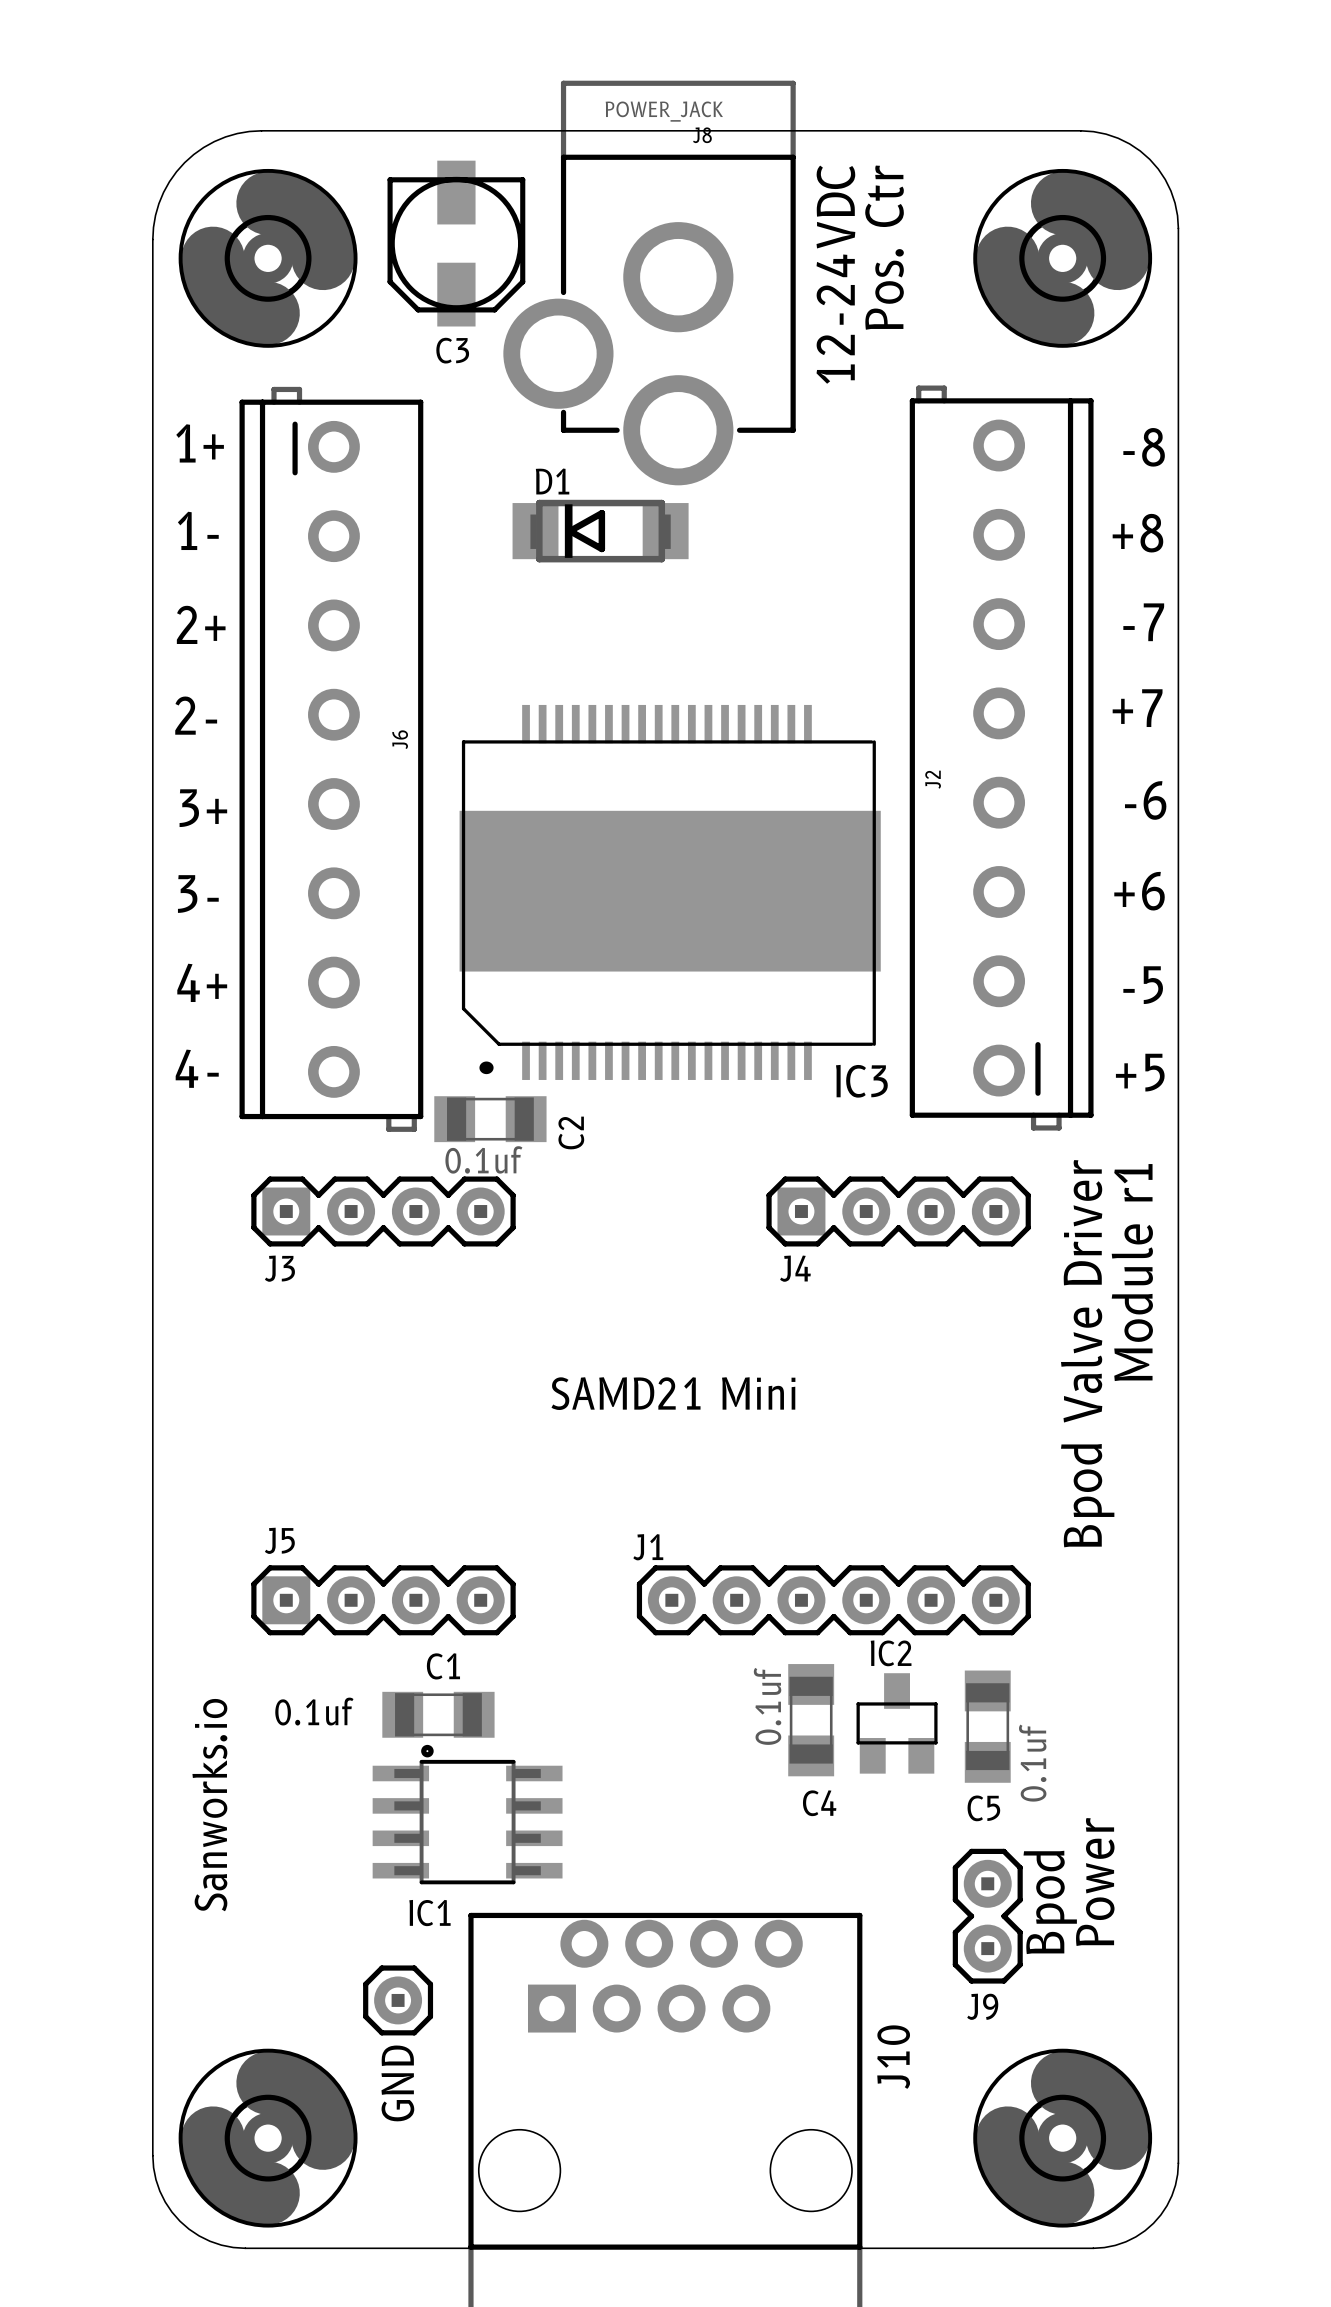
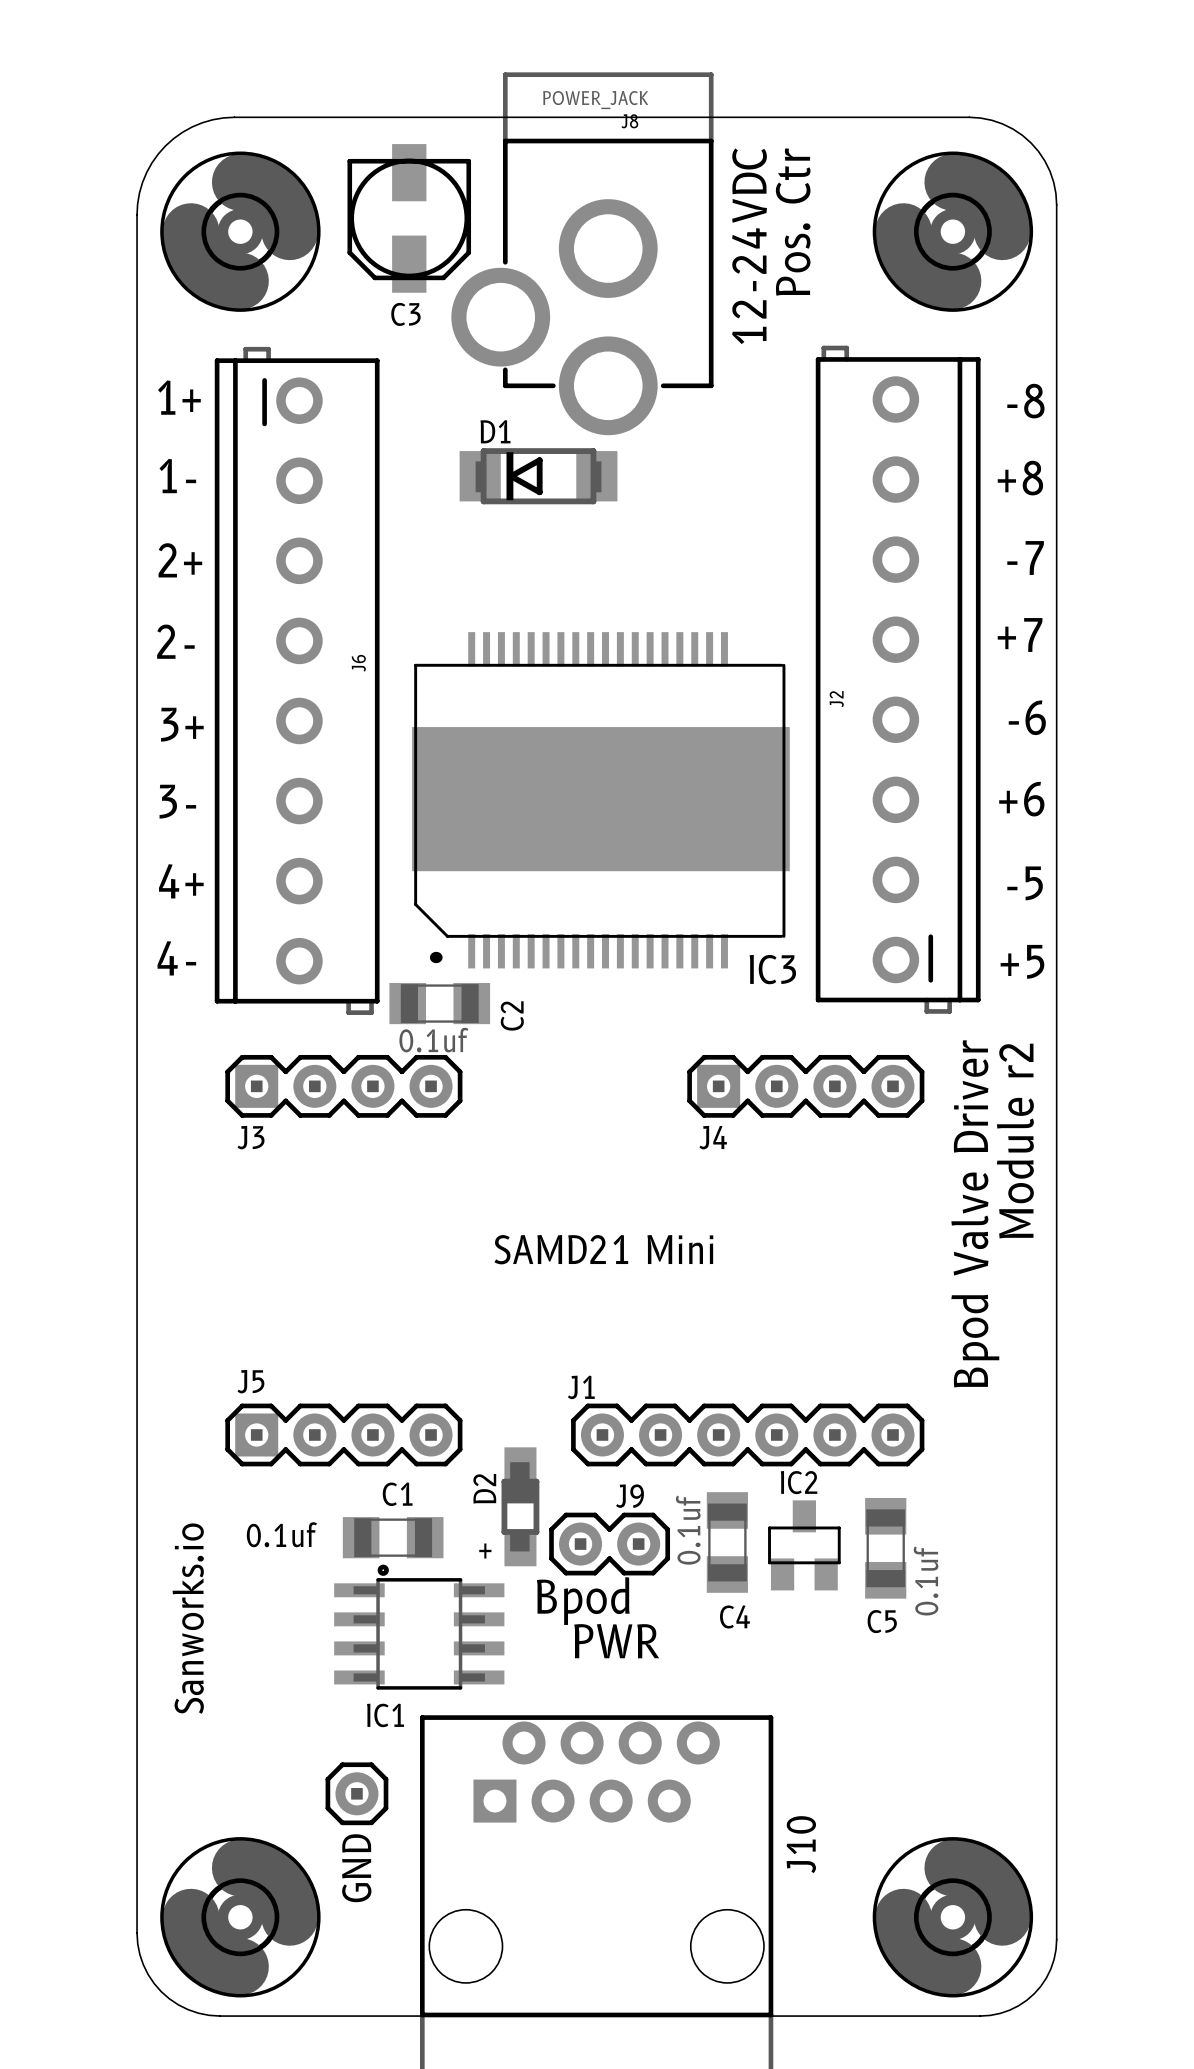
text: Module r1 (1132, 1272) -> Module r2 (1015, 1141)
D2: none -> (520, 1506)
text: none -> + (485, 1551)
text: none -> PWR (616, 1641)
text: Power (1095, 1882) -> none
text rotation: 0° (1050, 1902) -> 90° clockwise (583, 1601)
text position: Bpod (1050, 1902) -> Bpod (583, 1601)
J9 rotation: 0° (987, 1916) -> 90° clockwise (609, 1544)
J9 position: (987, 1916) -> (609, 1544)
J9 name position: J9 (982, 2006) -> J9 (630, 1496)

